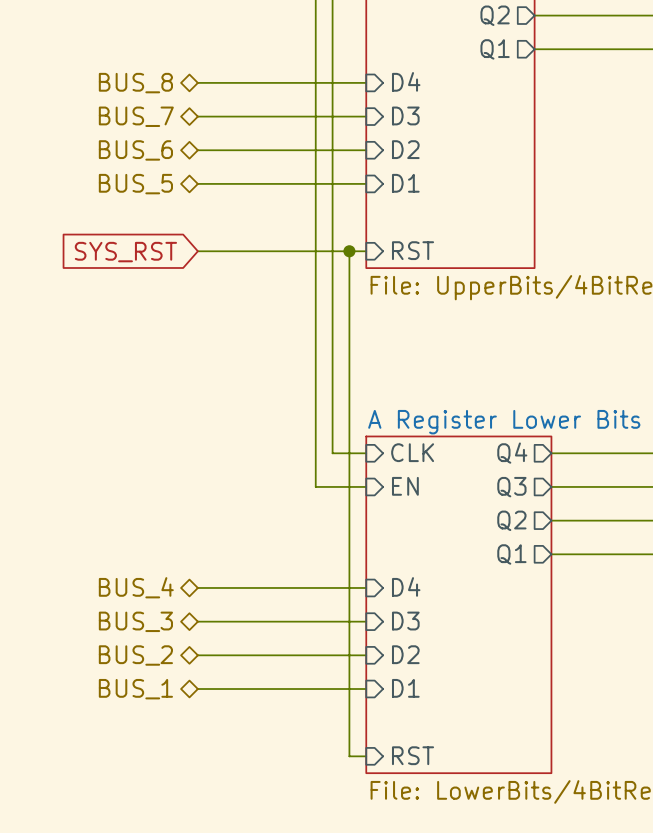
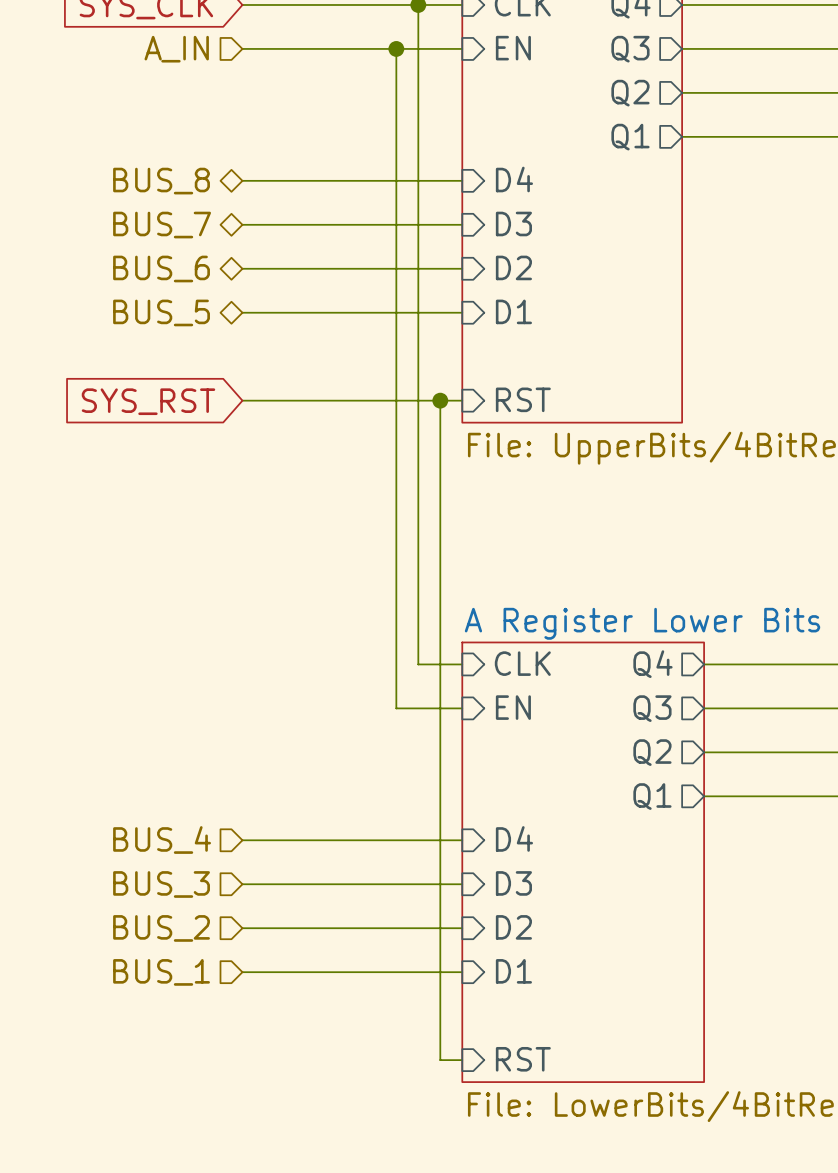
hierarchical label shape: bidirectional (136, 587) -> input (162, 839)
hierarchical label shape: bidirectional (135, 621) -> input (161, 884)
hierarchical label shape: bidirectional (135, 655) -> input (161, 928)
hierarchical label shape: bidirectional (135, 689) -> input (161, 972)

